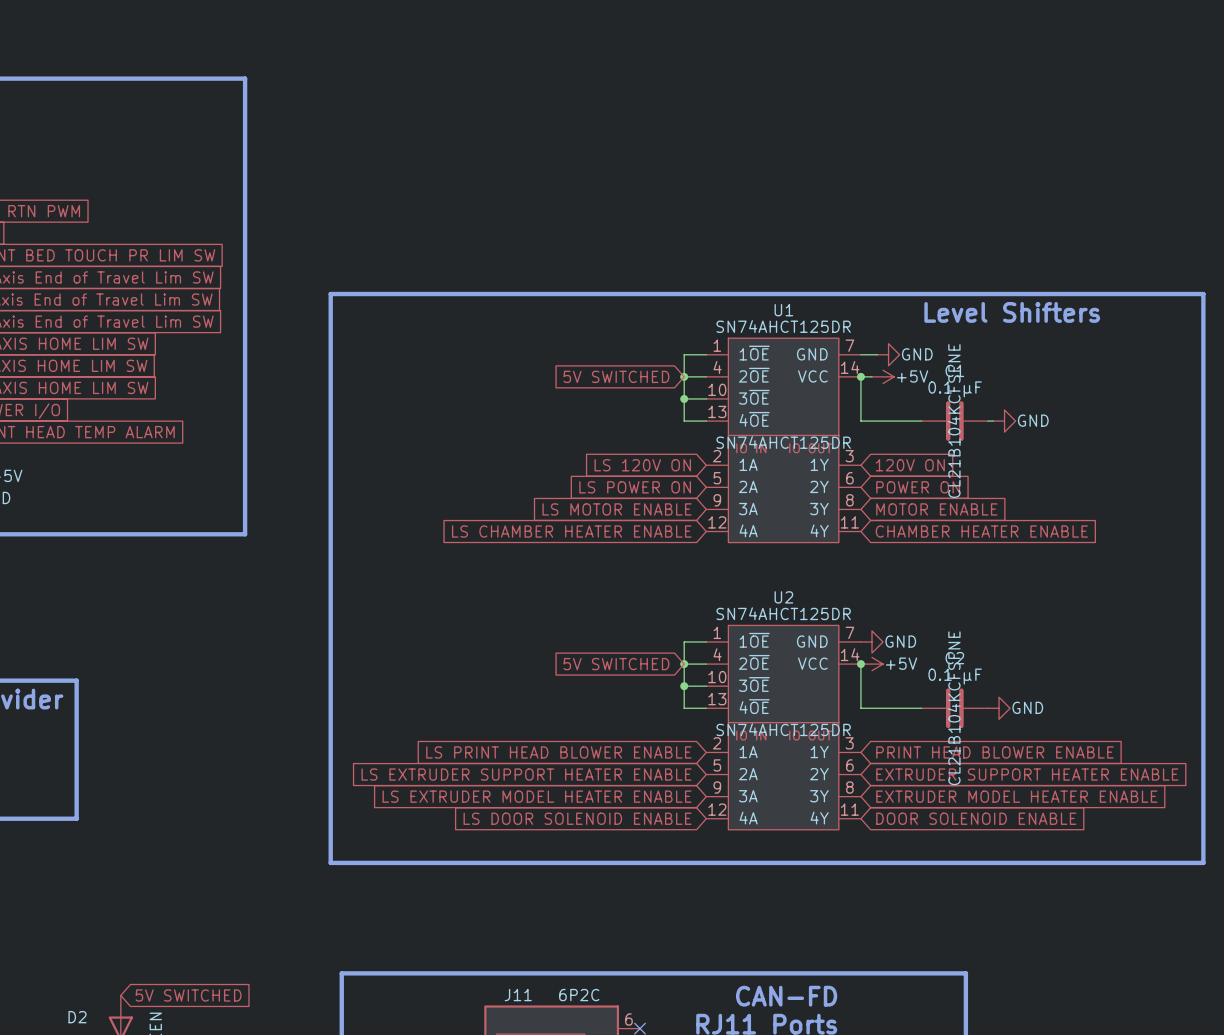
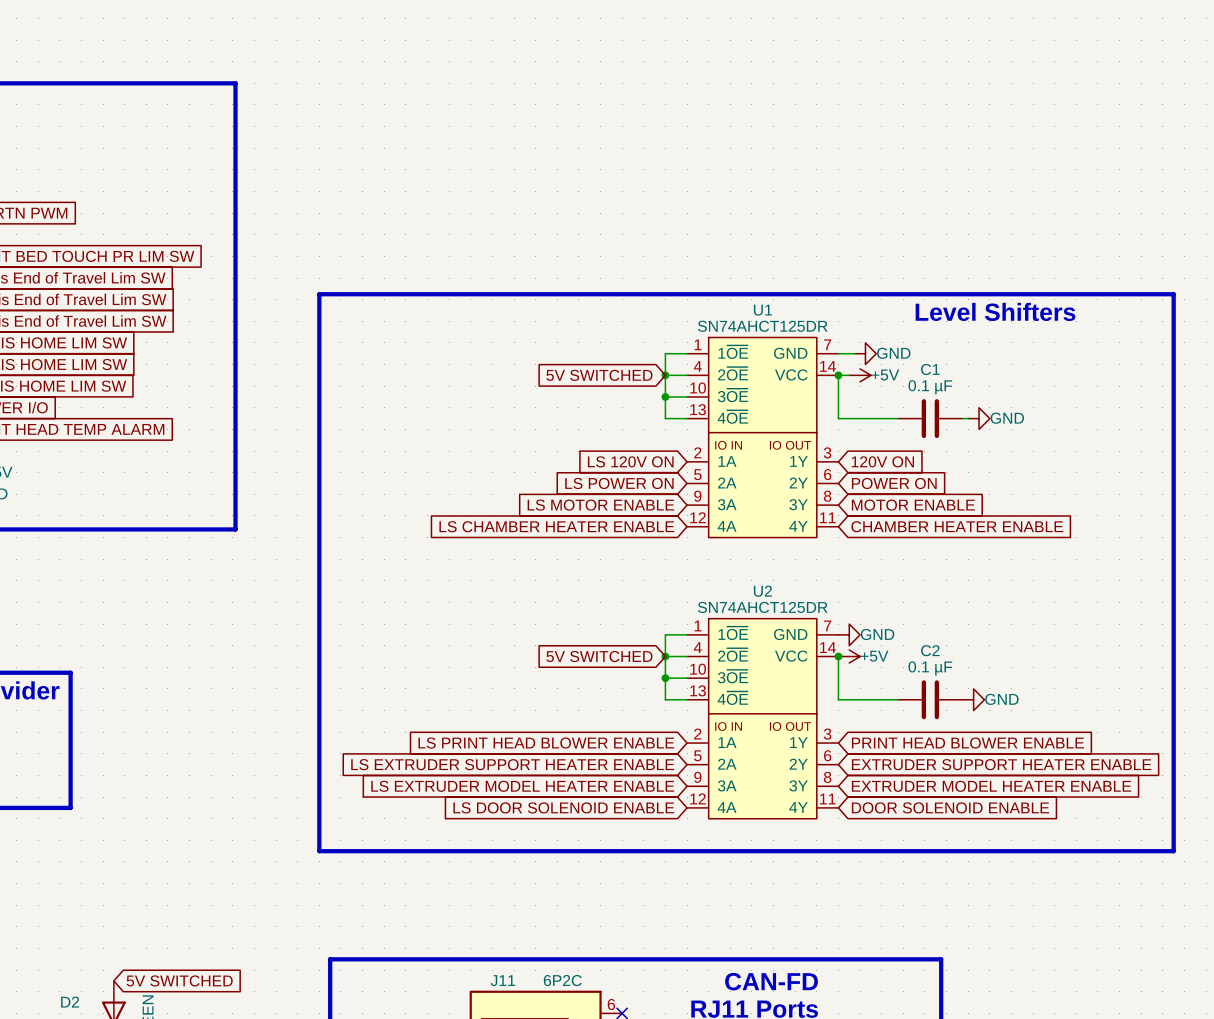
C1 text: CL21B104KCFSFNE (954, 421) -> none
U1 text: SN74AHCT125DR (783, 442) -> none
C2 text: CL21B104KCFSFNE (954, 708) -> none
U2 text: SN74AHCT125DR (783, 729) -> none

